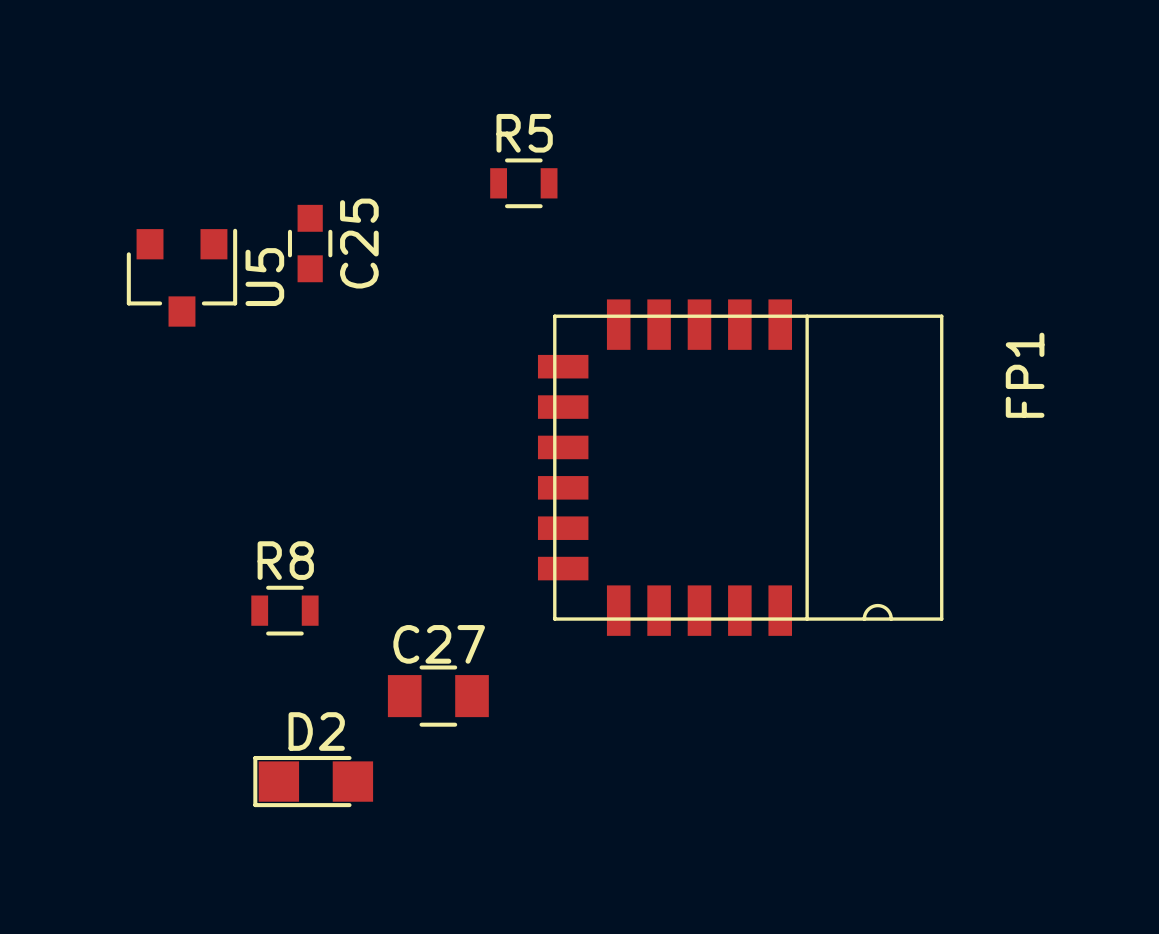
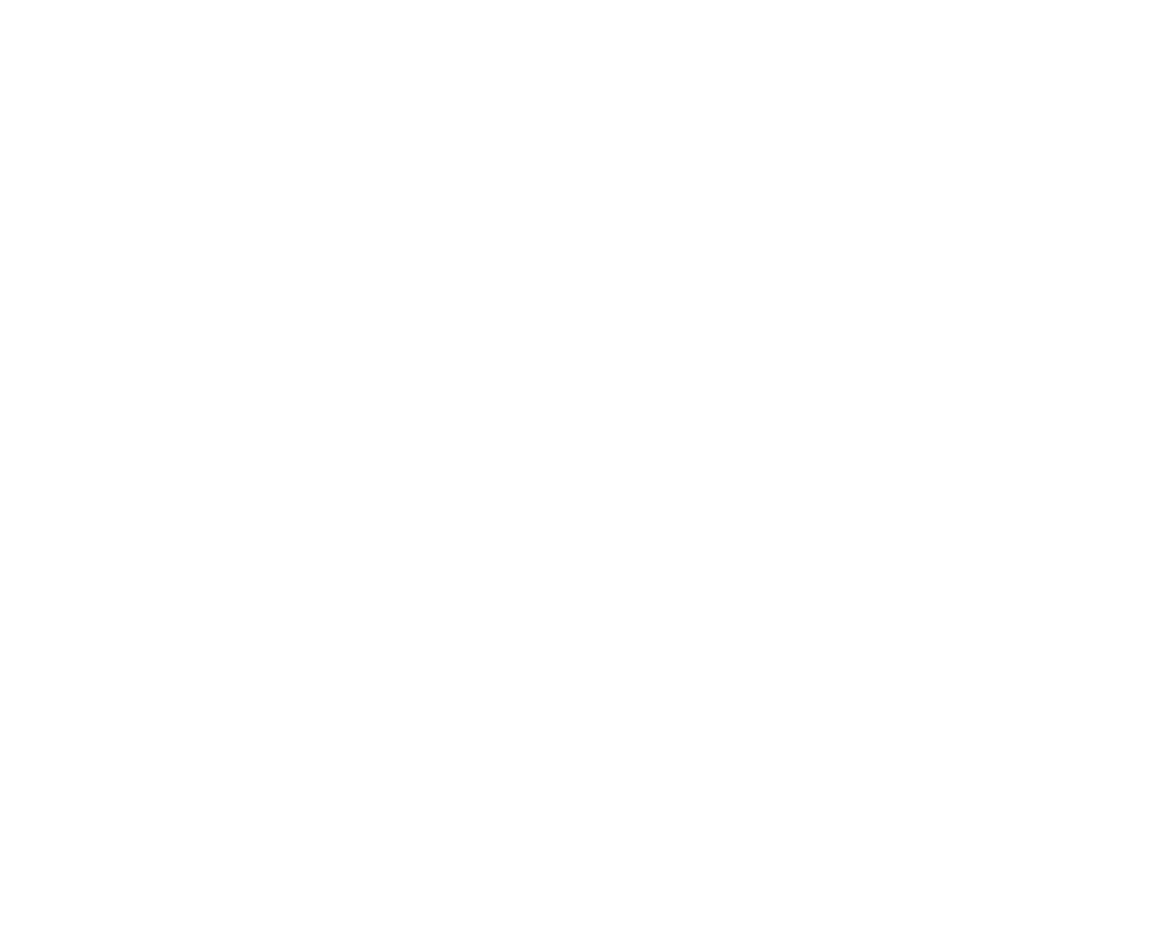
R5: (523, 183) -> none
C25: (310, 243) -> none
U5: (181, 277) -> none
FP1: (740, 467) -> none
R8: (284, 610) -> none
C27: (438, 696) -> none
D2: (313, 781) -> none

